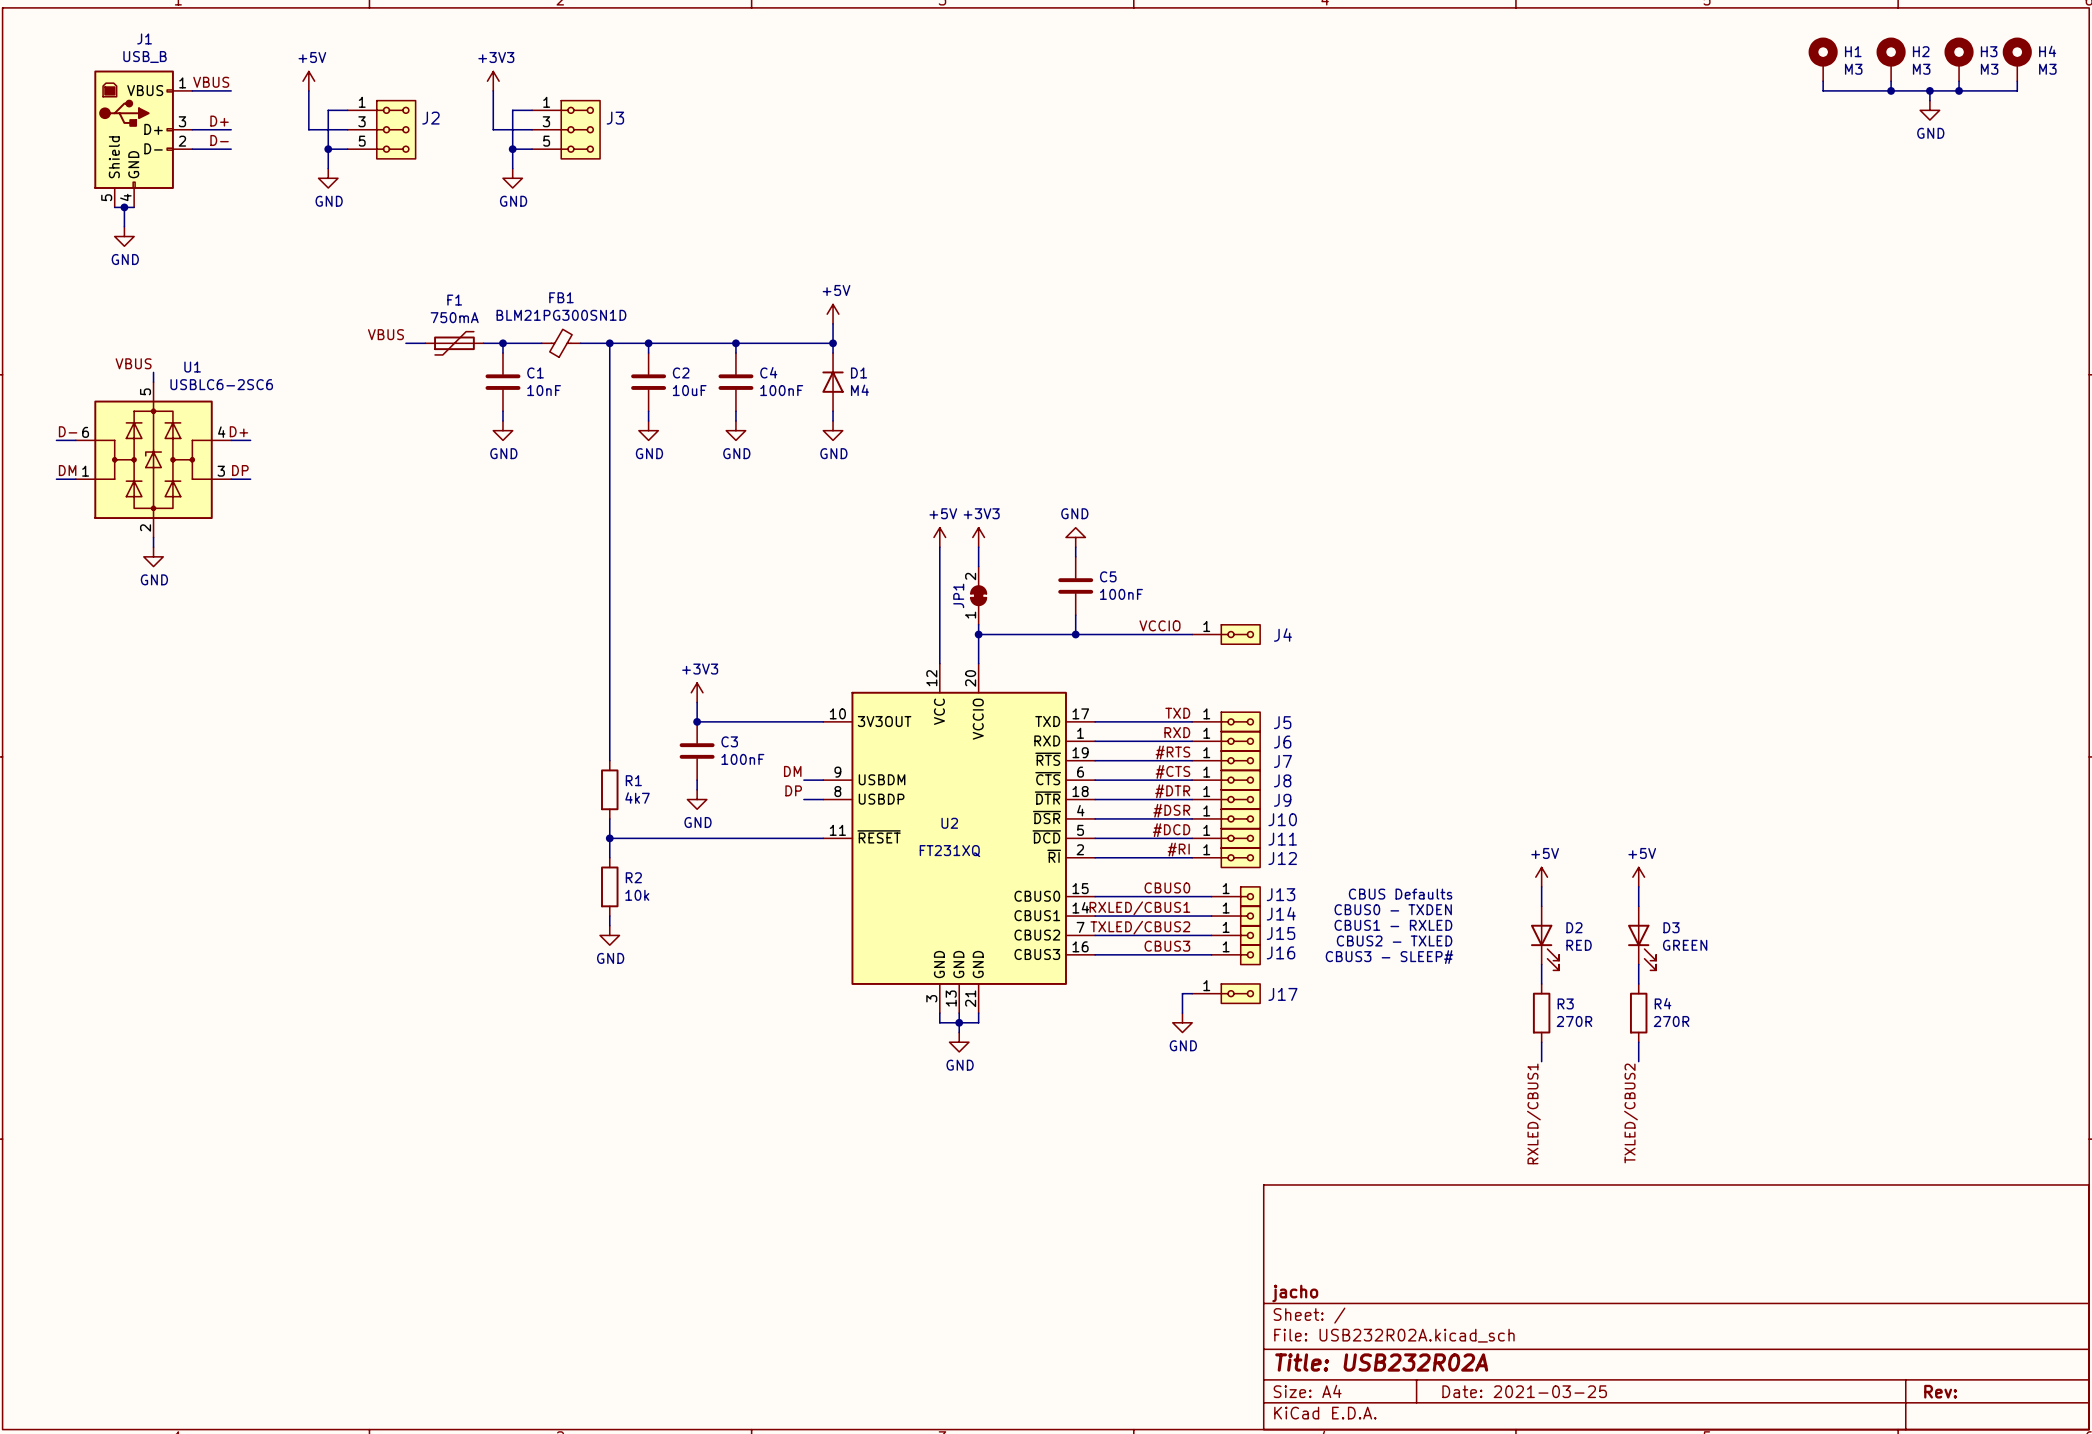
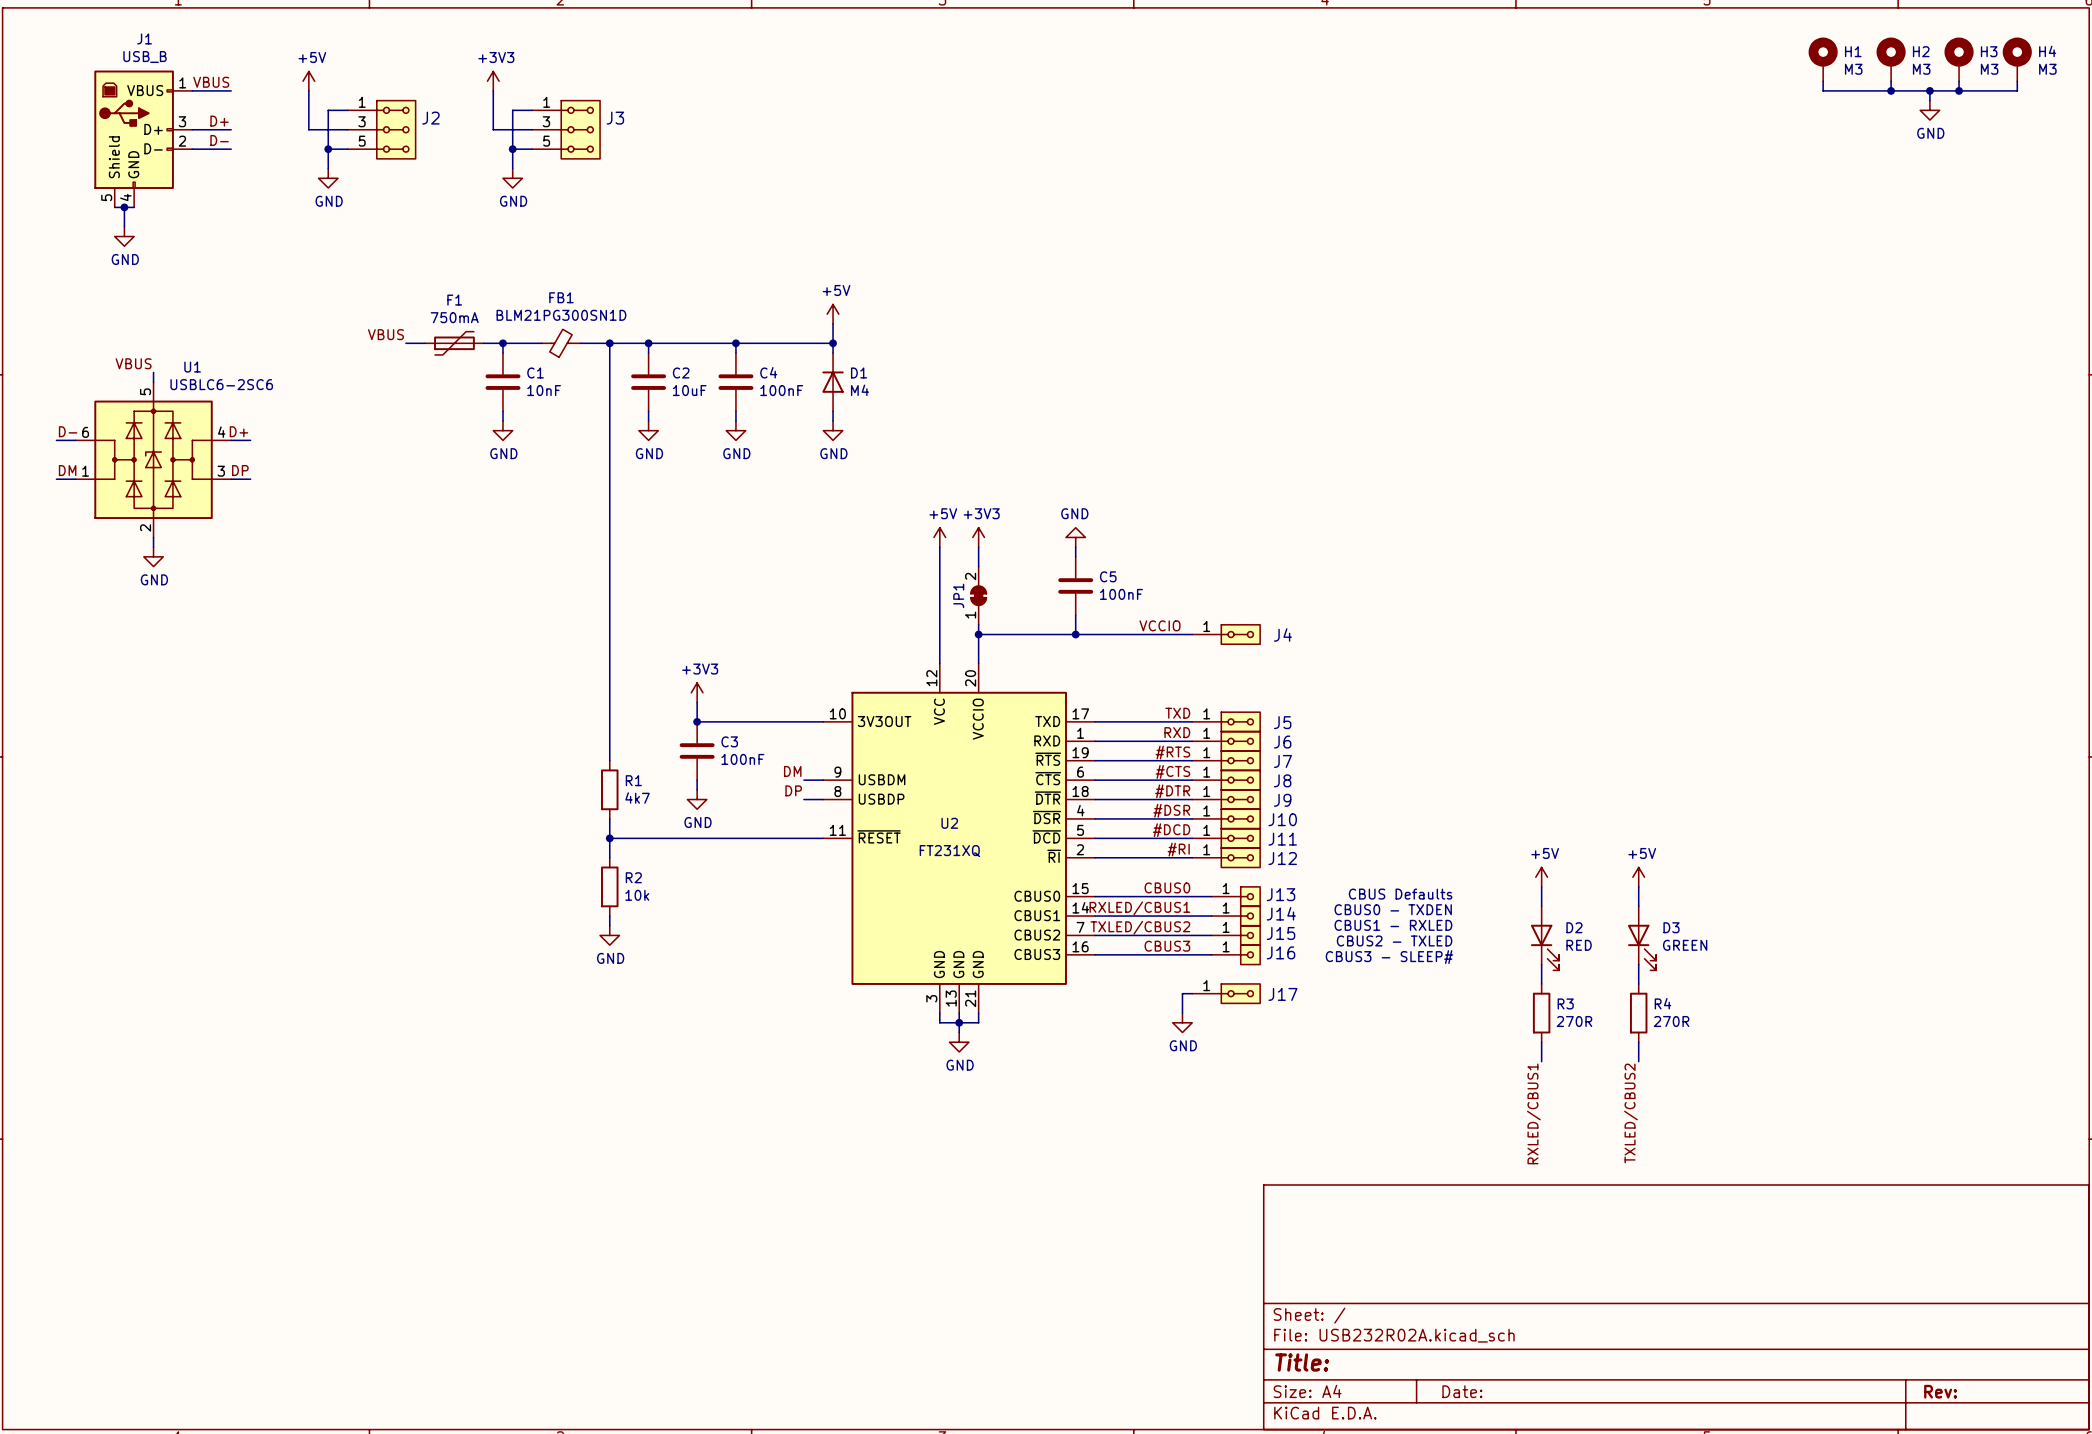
title block: jacho (1295, 1293) -> none
title block: Title: USB232R02A (1381, 1362) -> Title: (1302, 1362)
title block: Date: 2021-03-25 (1524, 1391) -> Date: (1462, 1391)

